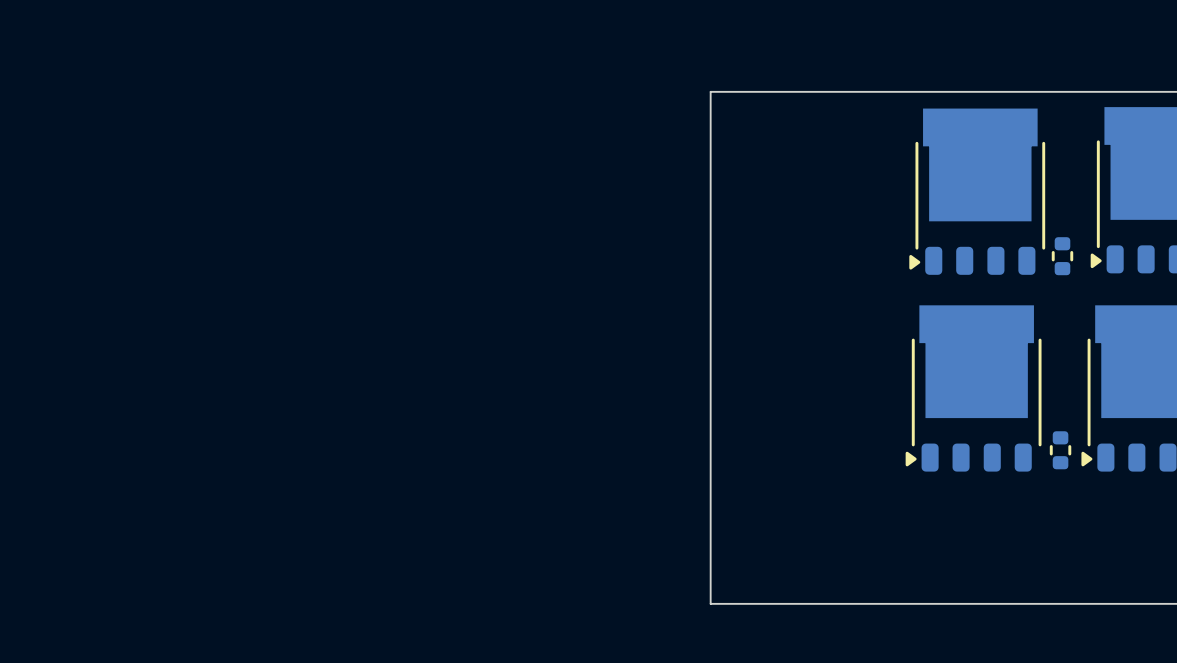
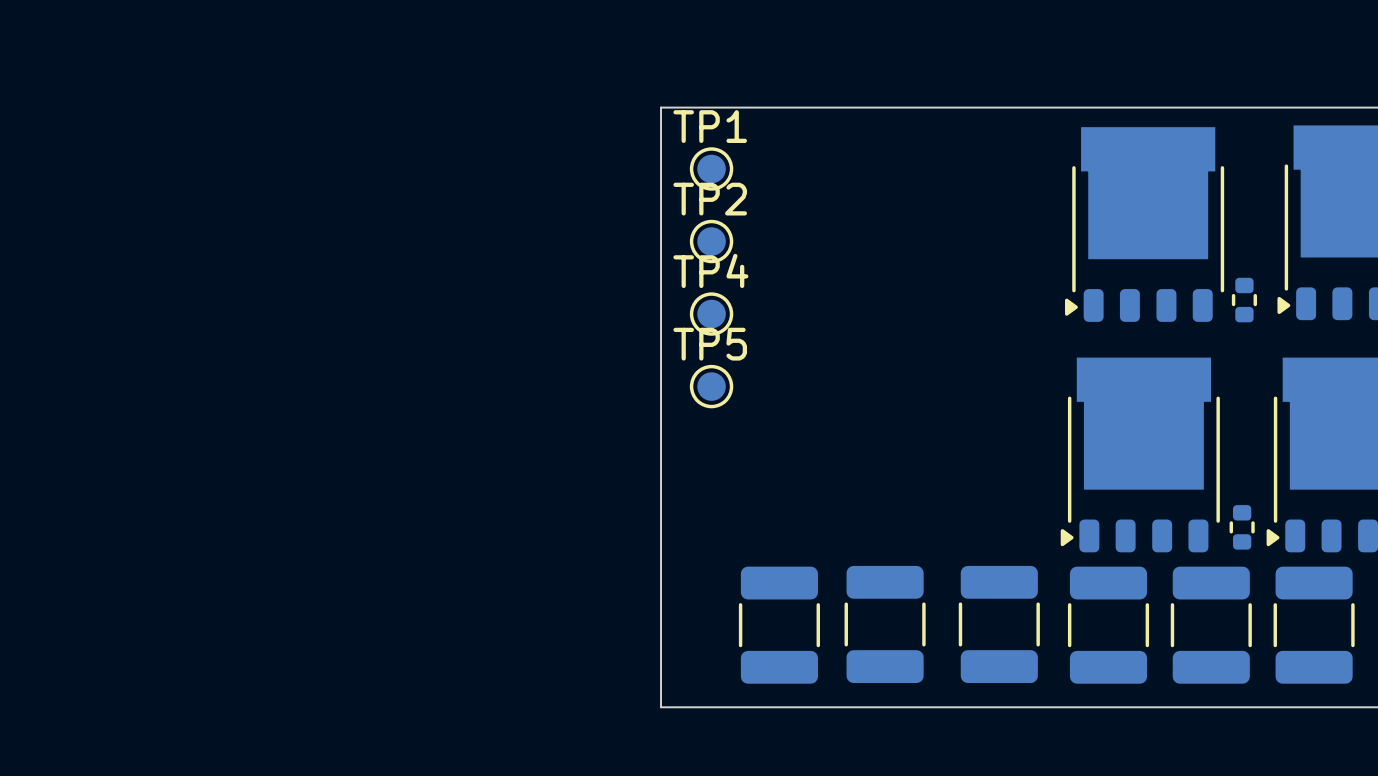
board edge: (710, 91) (710, 603) -> (832, 107) (661, 107) (661, 707) (832, 707)
TP1: none -> (711, 168)
TP2: none -> (711, 241)
TP4: none -> (711, 314)
TP5: none -> (711, 386)
part: none -> (779, 625)
part: none -> (885, 624)
part: none -> (999, 624)
part: none -> (1108, 625)
part: none -> (1211, 625)
part: none -> (1314, 625)

